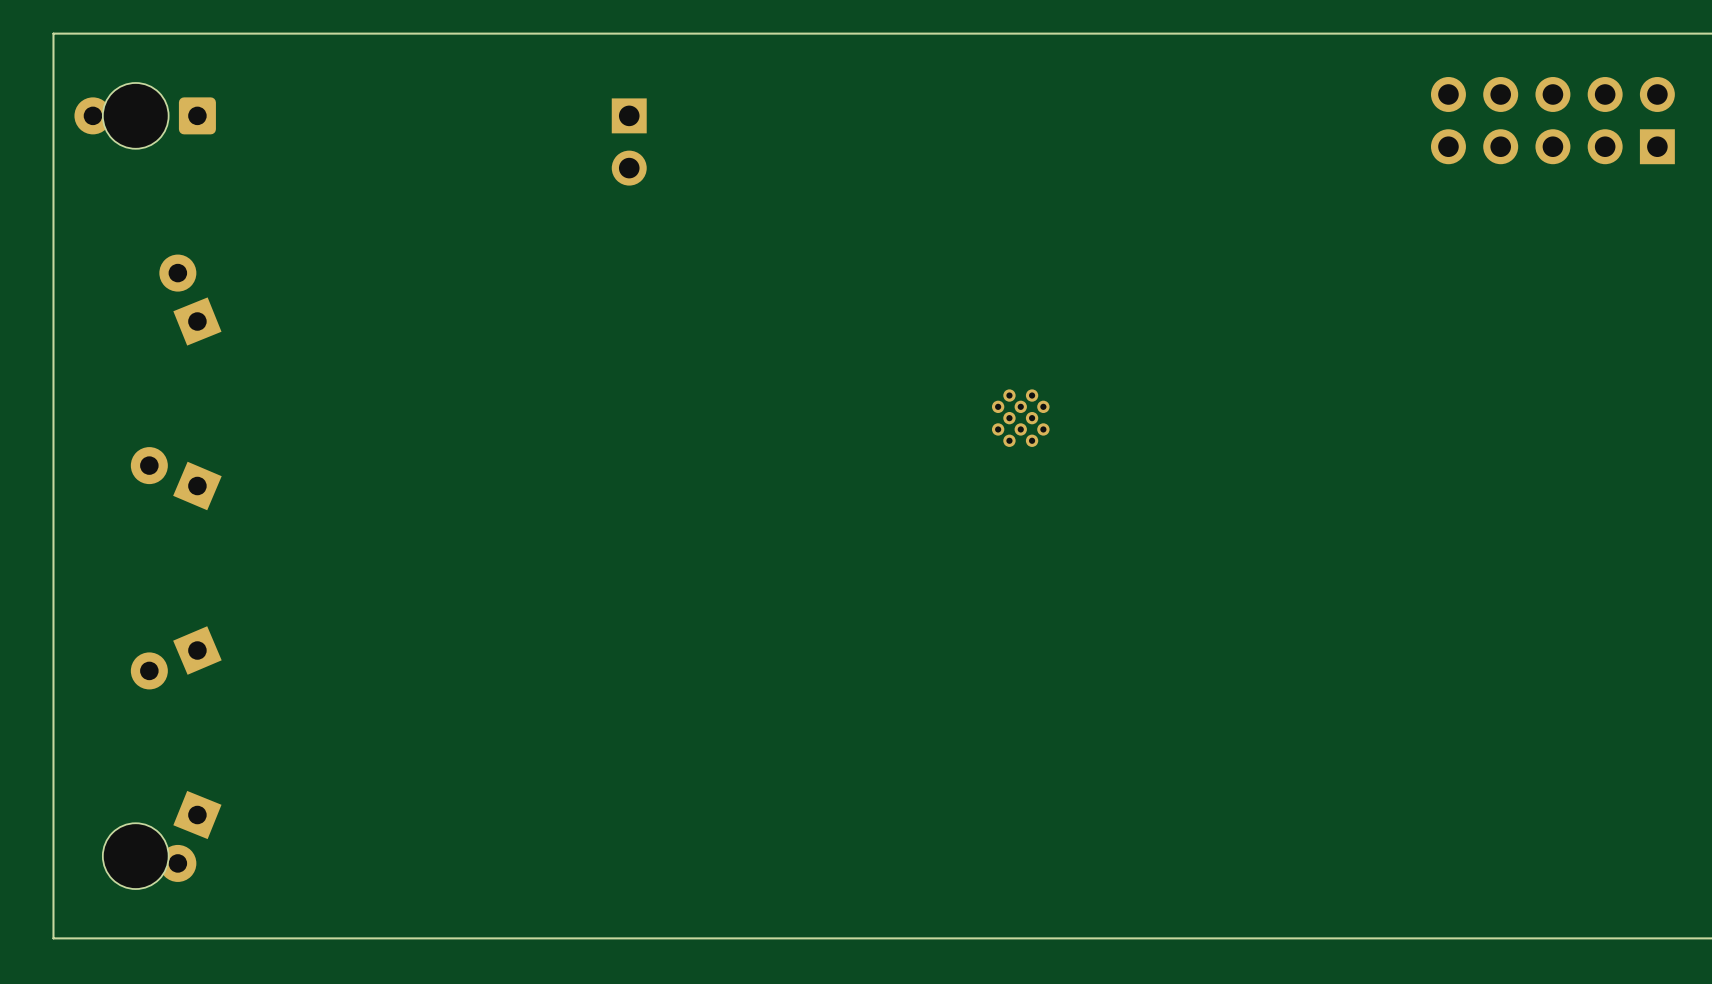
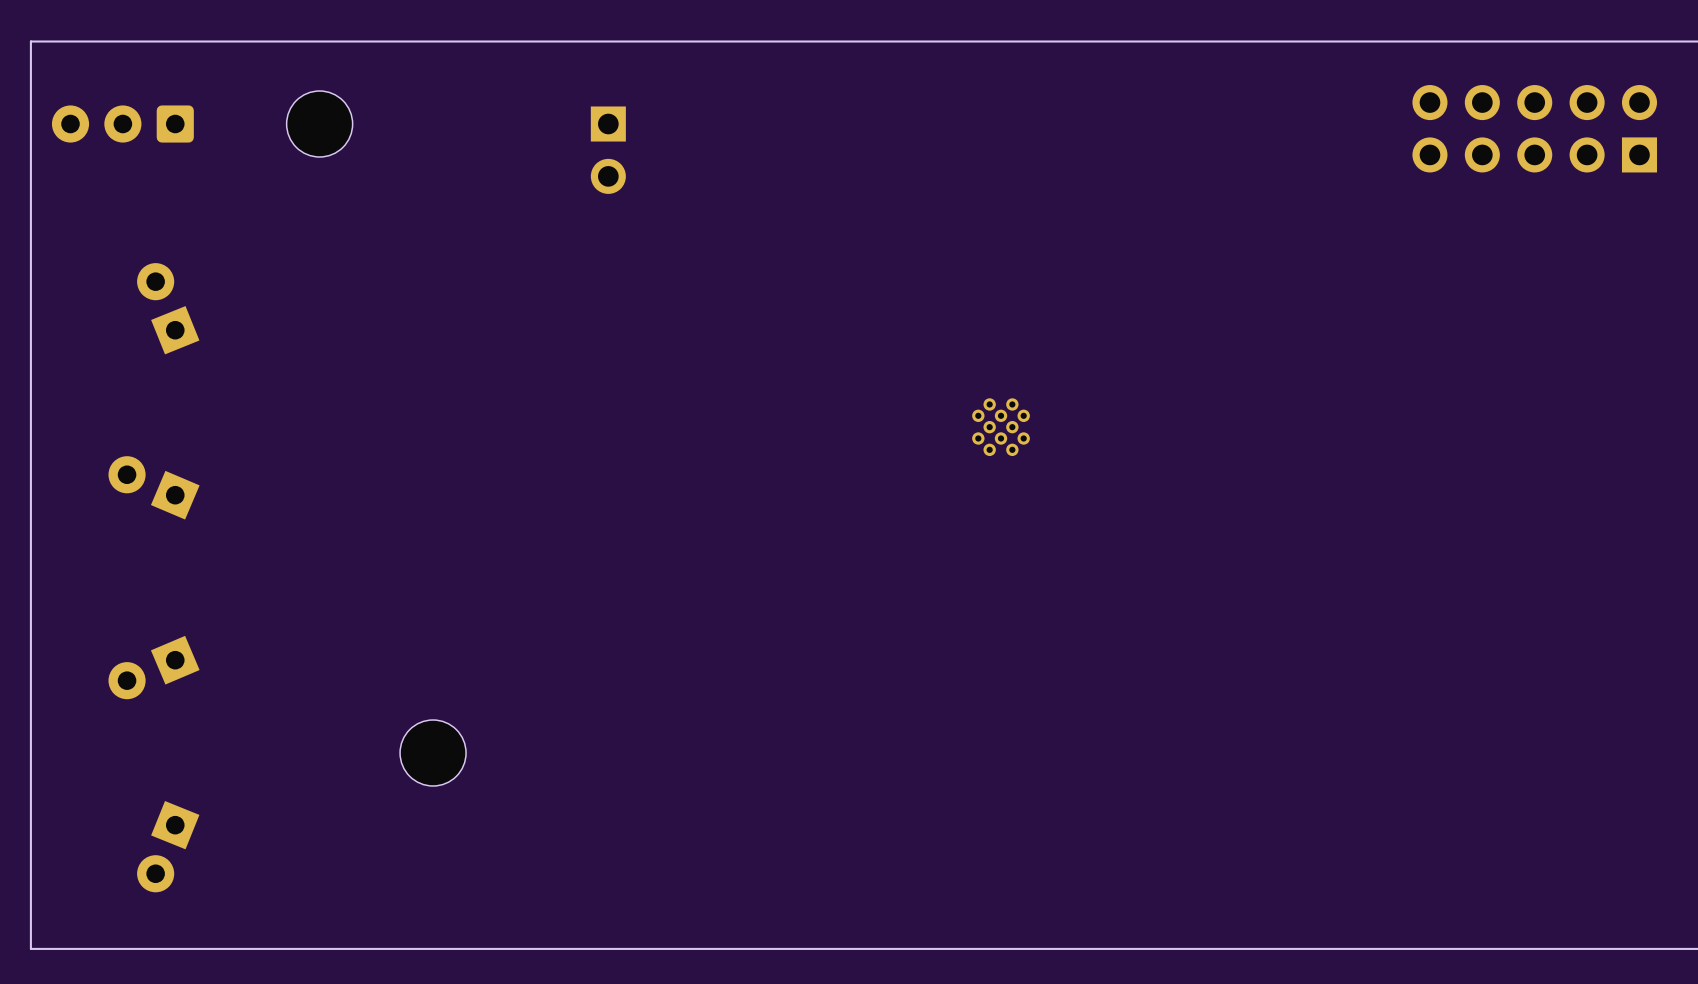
part position: (135, 115) -> (319, 124)
part position: (135, 856) -> (433, 753)

